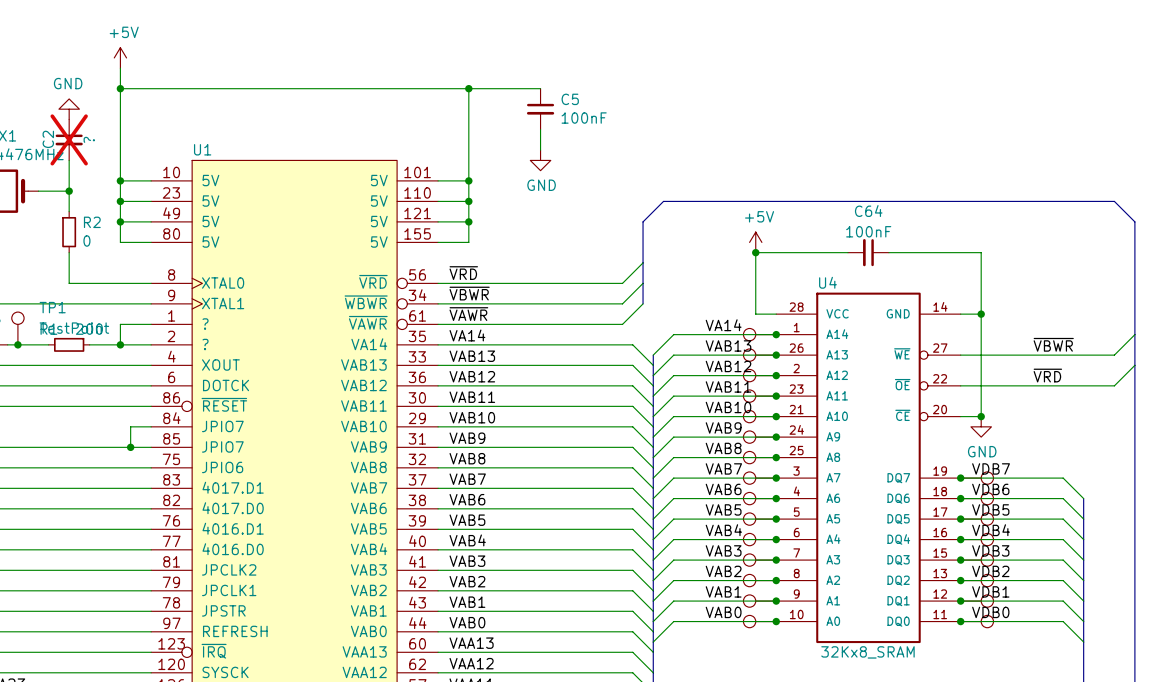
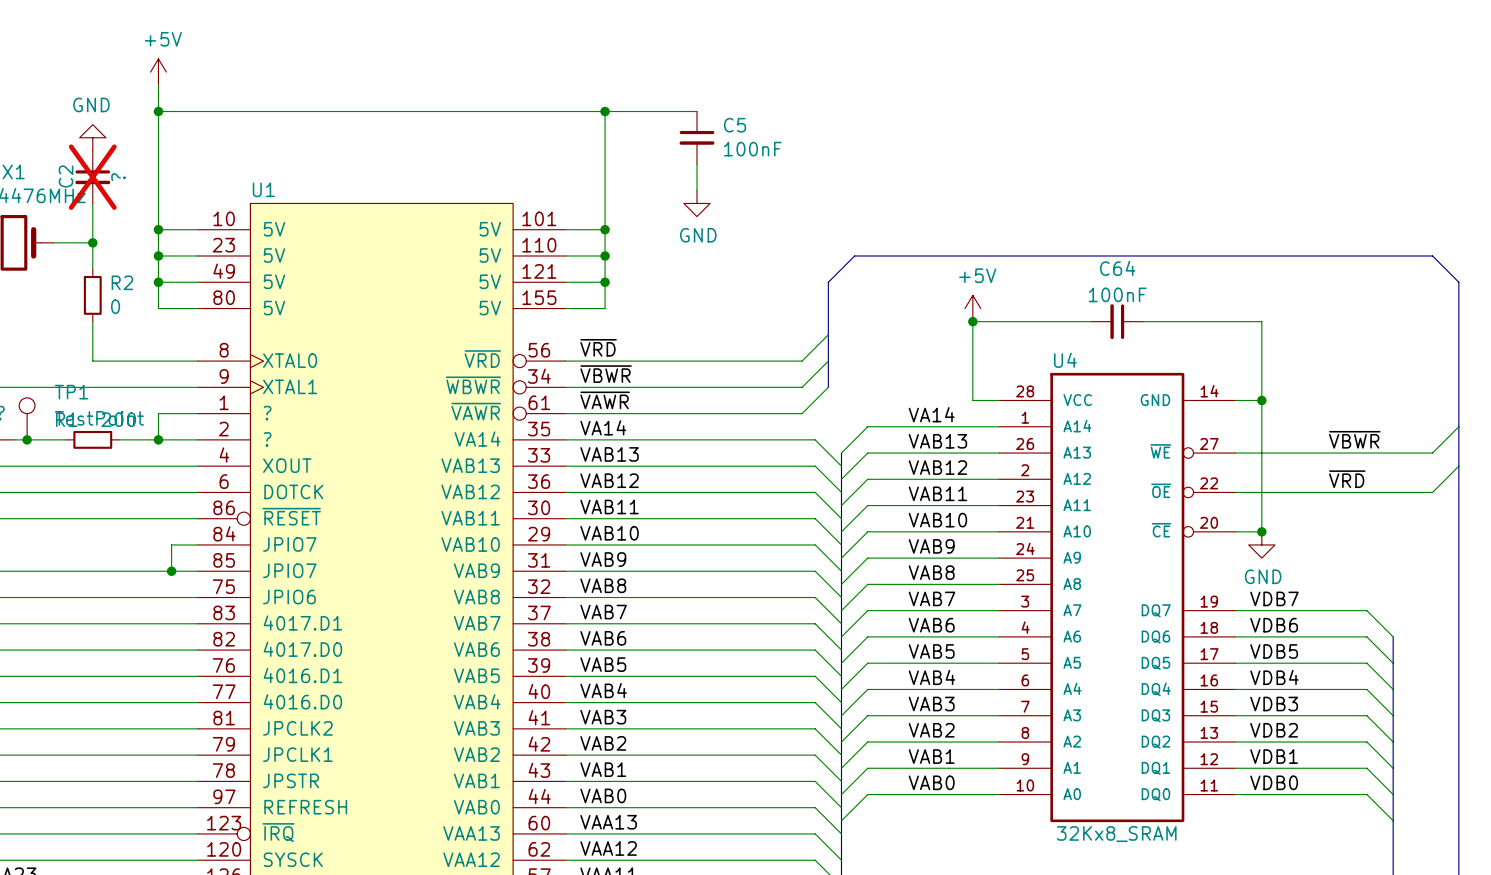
part: (759, 334) -> none
junction: (776, 334) -> none
part: (759, 355) -> none
junction: (776, 355) -> none
part: (759, 375) -> none
junction: (776, 375) -> none
part: (759, 396) -> none
junction: (776, 396) -> none
part: (759, 416) -> none
junction: (776, 416) -> none
part: (759, 437) -> none
junction: (776, 437) -> none
part: (759, 457) -> none
junction: (776, 457) -> none
part: (759, 478) -> none
junction: (776, 478) -> none
junction: (960, 478) -> none
part: (977, 478) -> none
part: (759, 498) -> none
junction: (776, 498) -> none
junction: (960, 498) -> none
part: (977, 498) -> none
part: (759, 519) -> none
junction: (776, 519) -> none
junction: (960, 519) -> none
part: (977, 519) -> none
part: (759, 539) -> none
junction: (776, 539) -> none
junction: (960, 539) -> none
part: (977, 539) -> none
part: (759, 560) -> none
junction: (776, 560) -> none
junction: (960, 560) -> none
part: (977, 560) -> none
part: (759, 580) -> none
junction: (776, 580) -> none
junction: (960, 580) -> none
part: (977, 580) -> none
part: (759, 601) -> none
junction: (776, 601) -> none
junction: (960, 601) -> none
part: (977, 601) -> none
part: (759, 621) -> none
junction: (776, 621) -> none
junction: (960, 621) -> none
part: (977, 621) -> none

